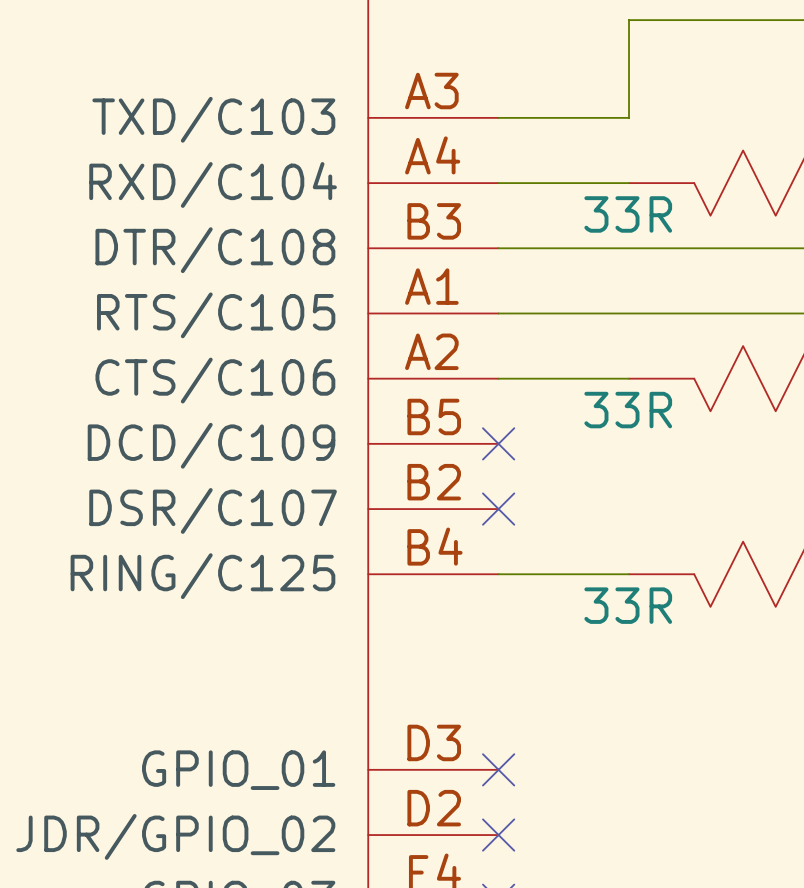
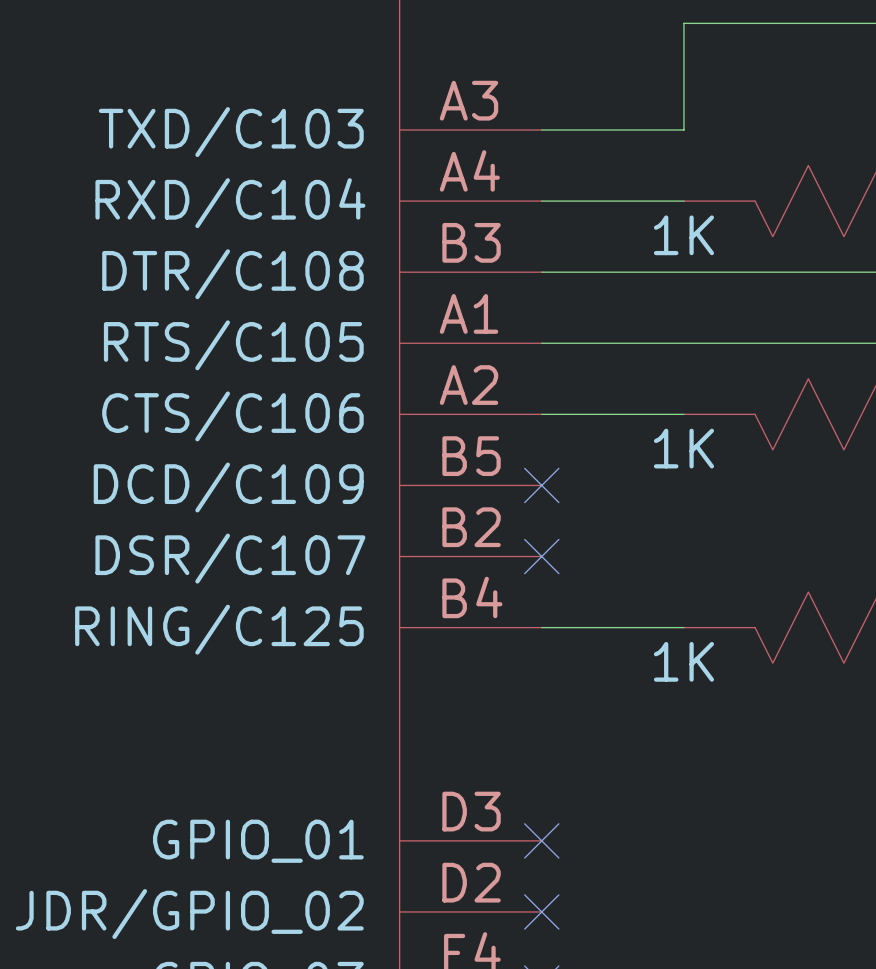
part value: 33R (628, 214) -> 1K (683, 235)
part value: 33R (628, 410) -> 1K (683, 448)
part value: 33R (628, 605) -> 1K (683, 661)

